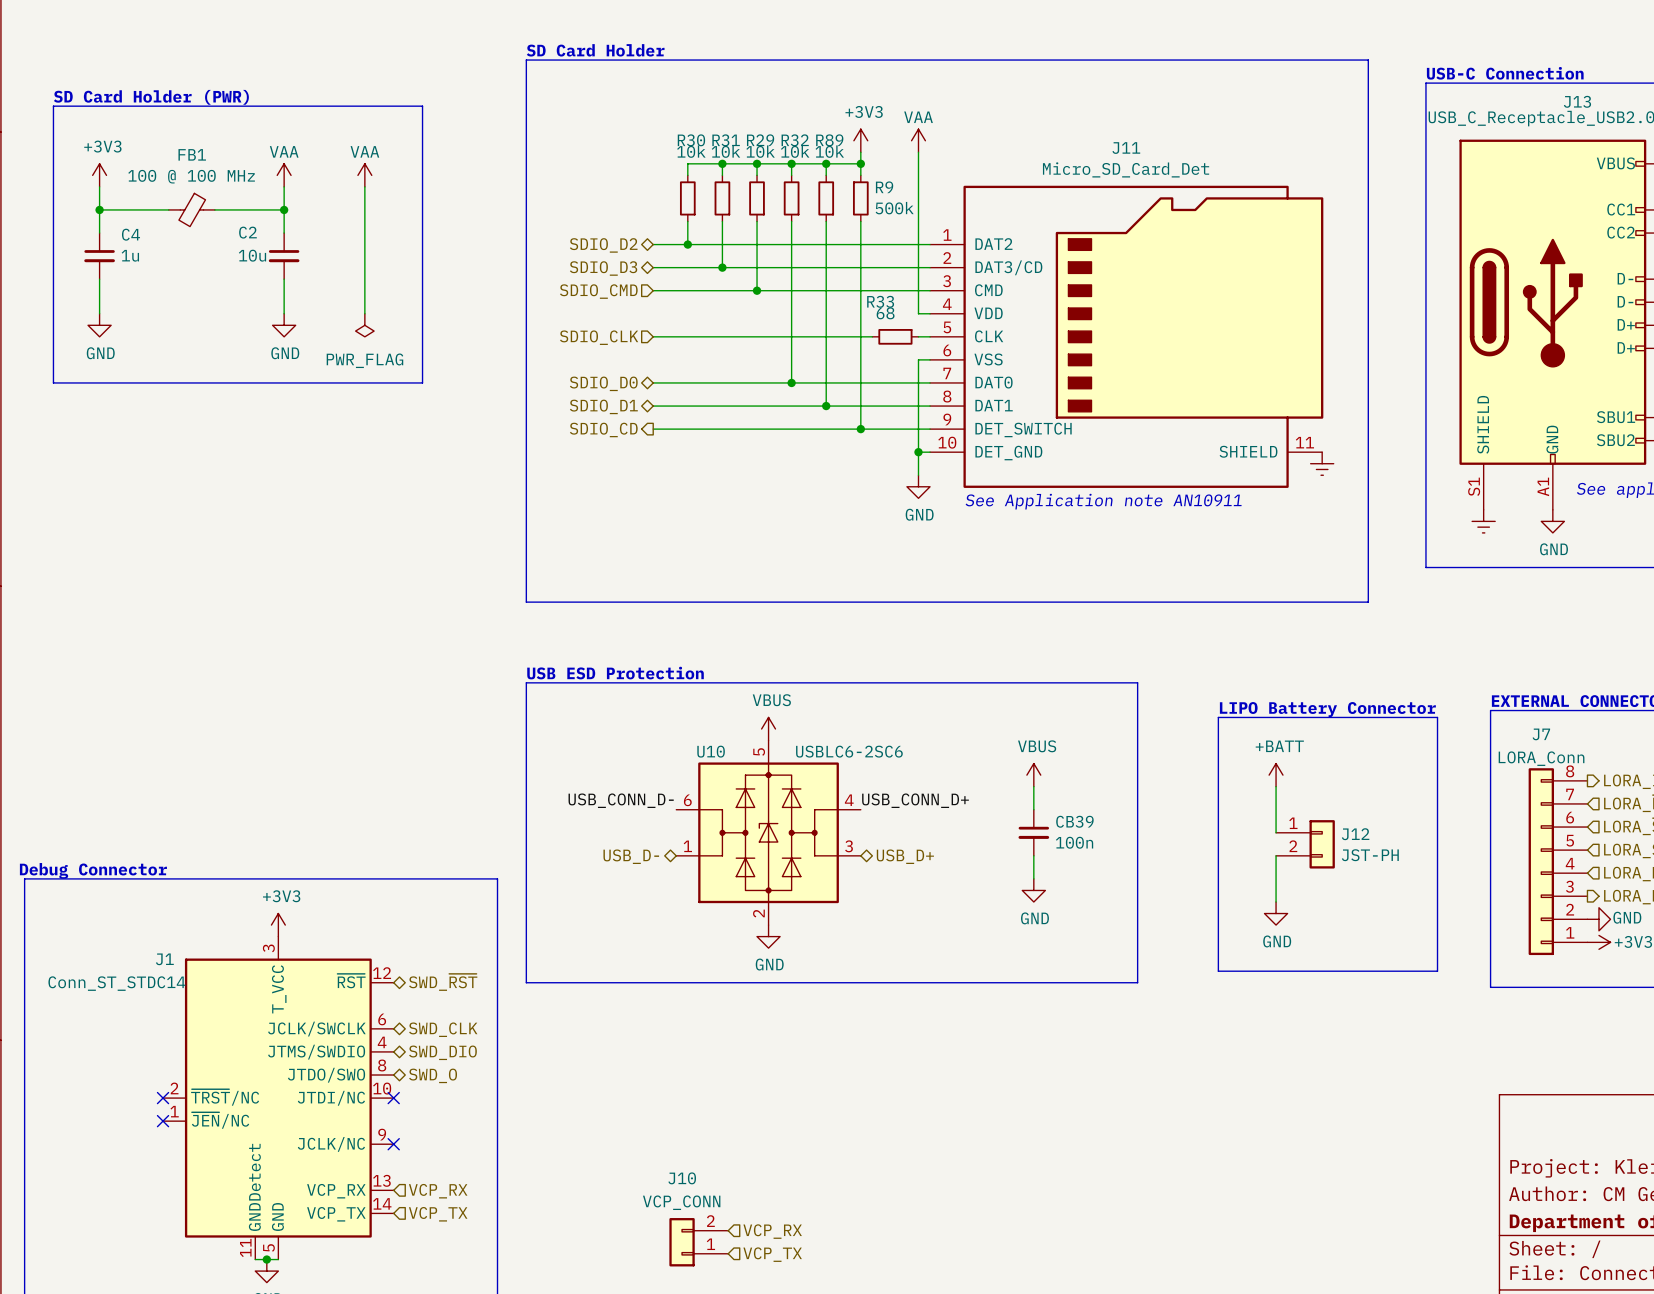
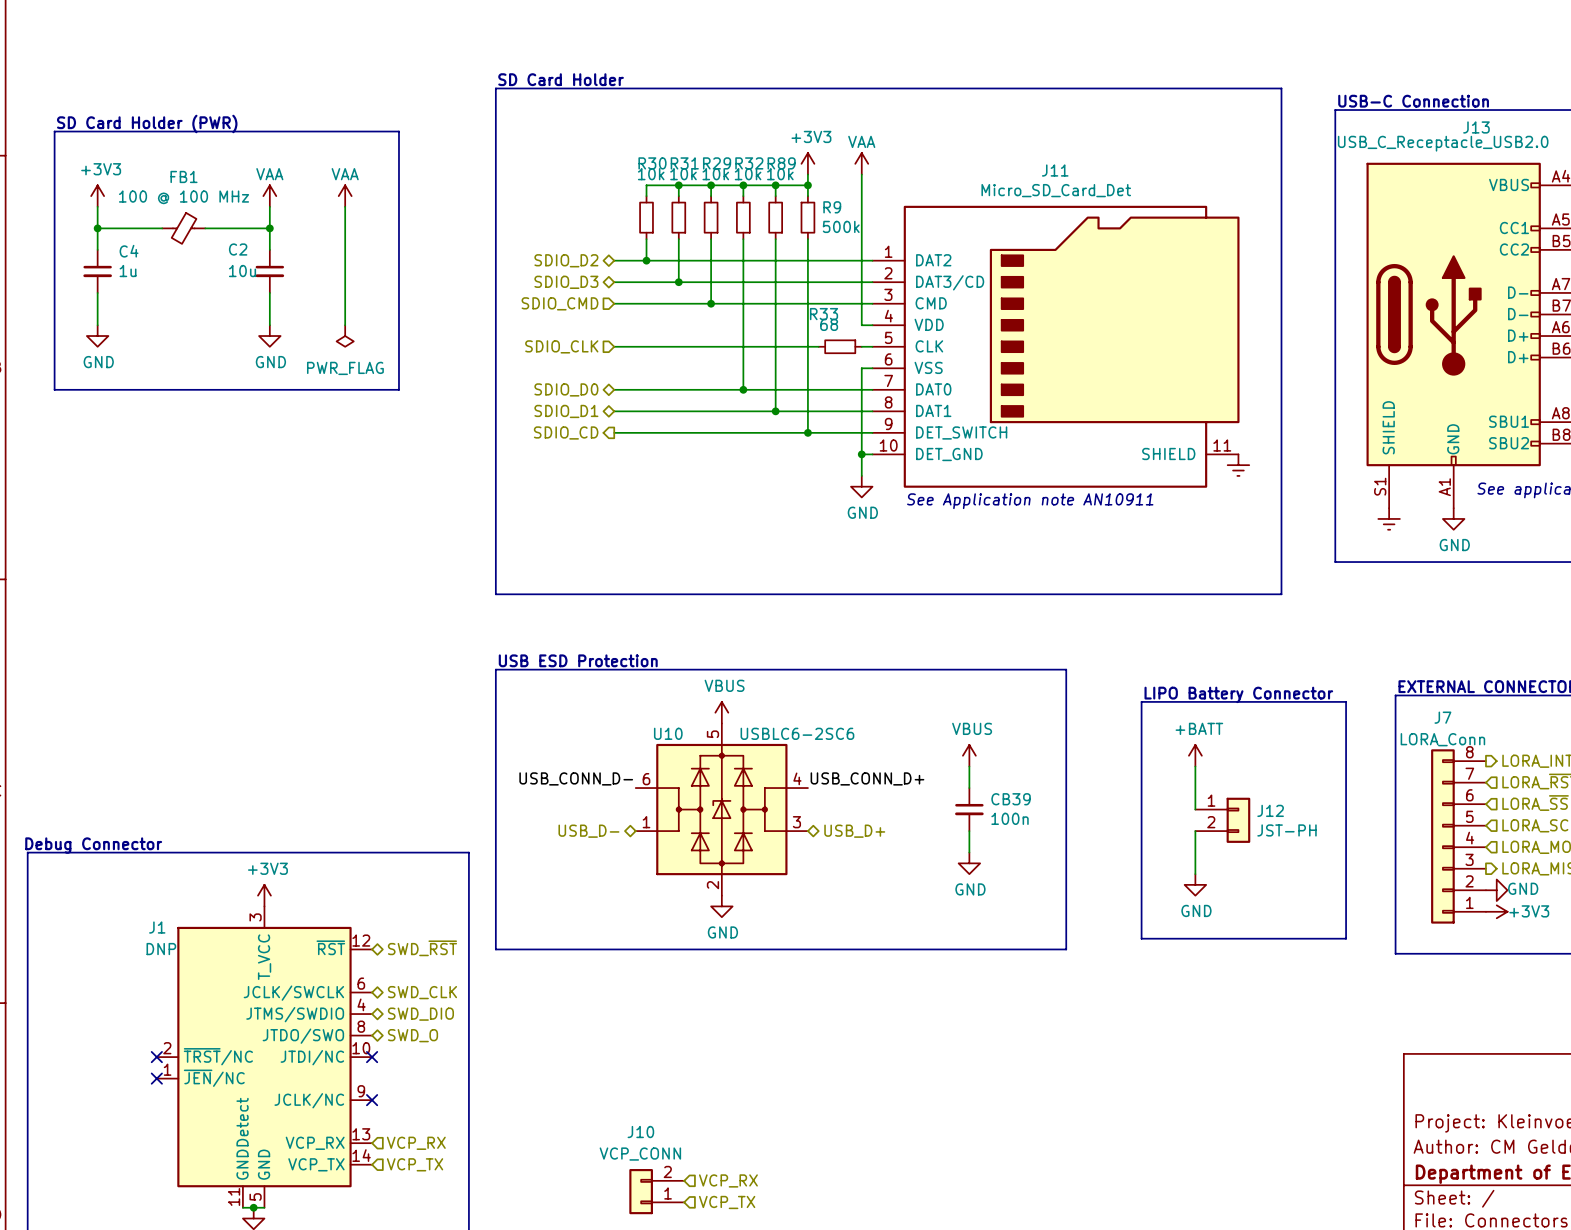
J1 value: Conn_ST_STDC14 (116, 983) -> DNP (161, 949)

